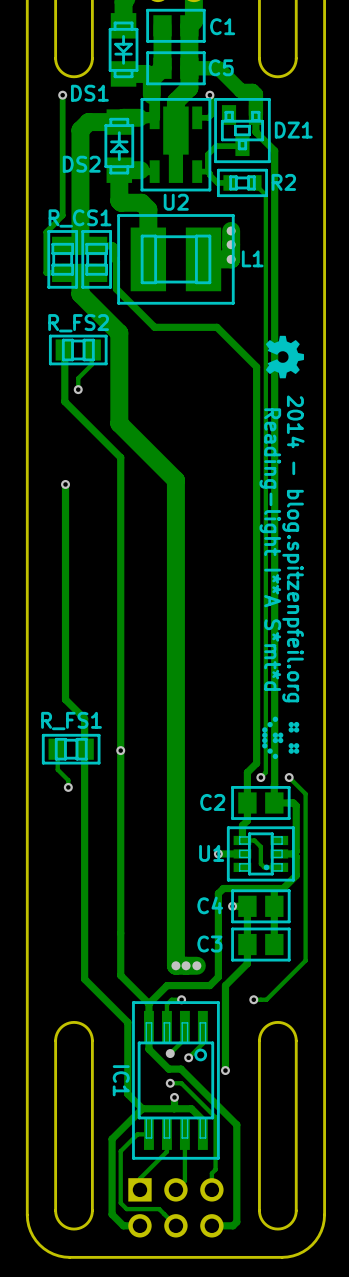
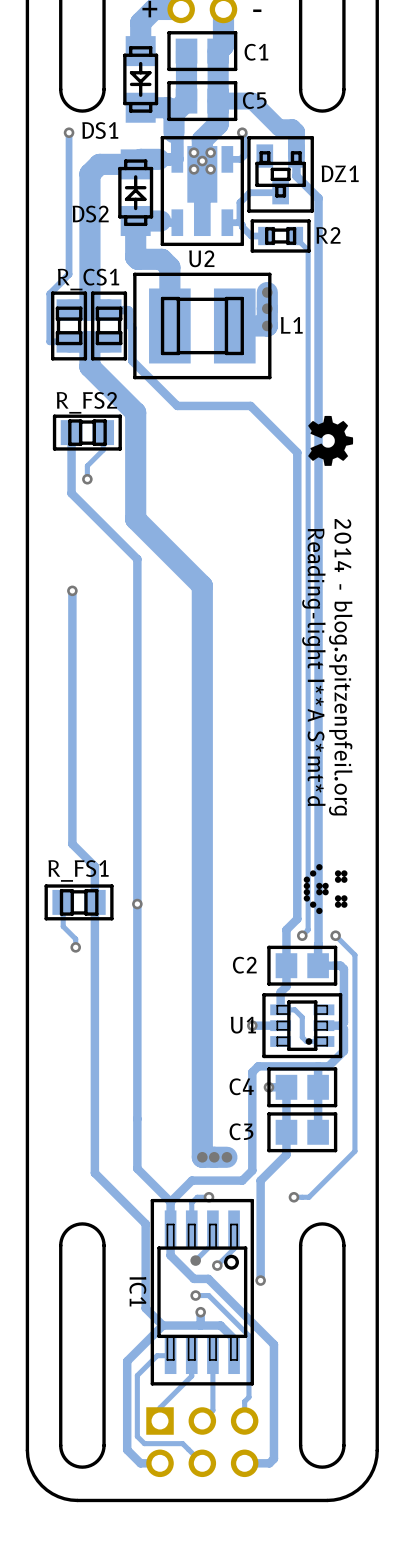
via: none -> (194, 152)
via: none -> (210, 152)
via: none -> (202, 161)
via: none -> (194, 169)
via: none -> (210, 169)

